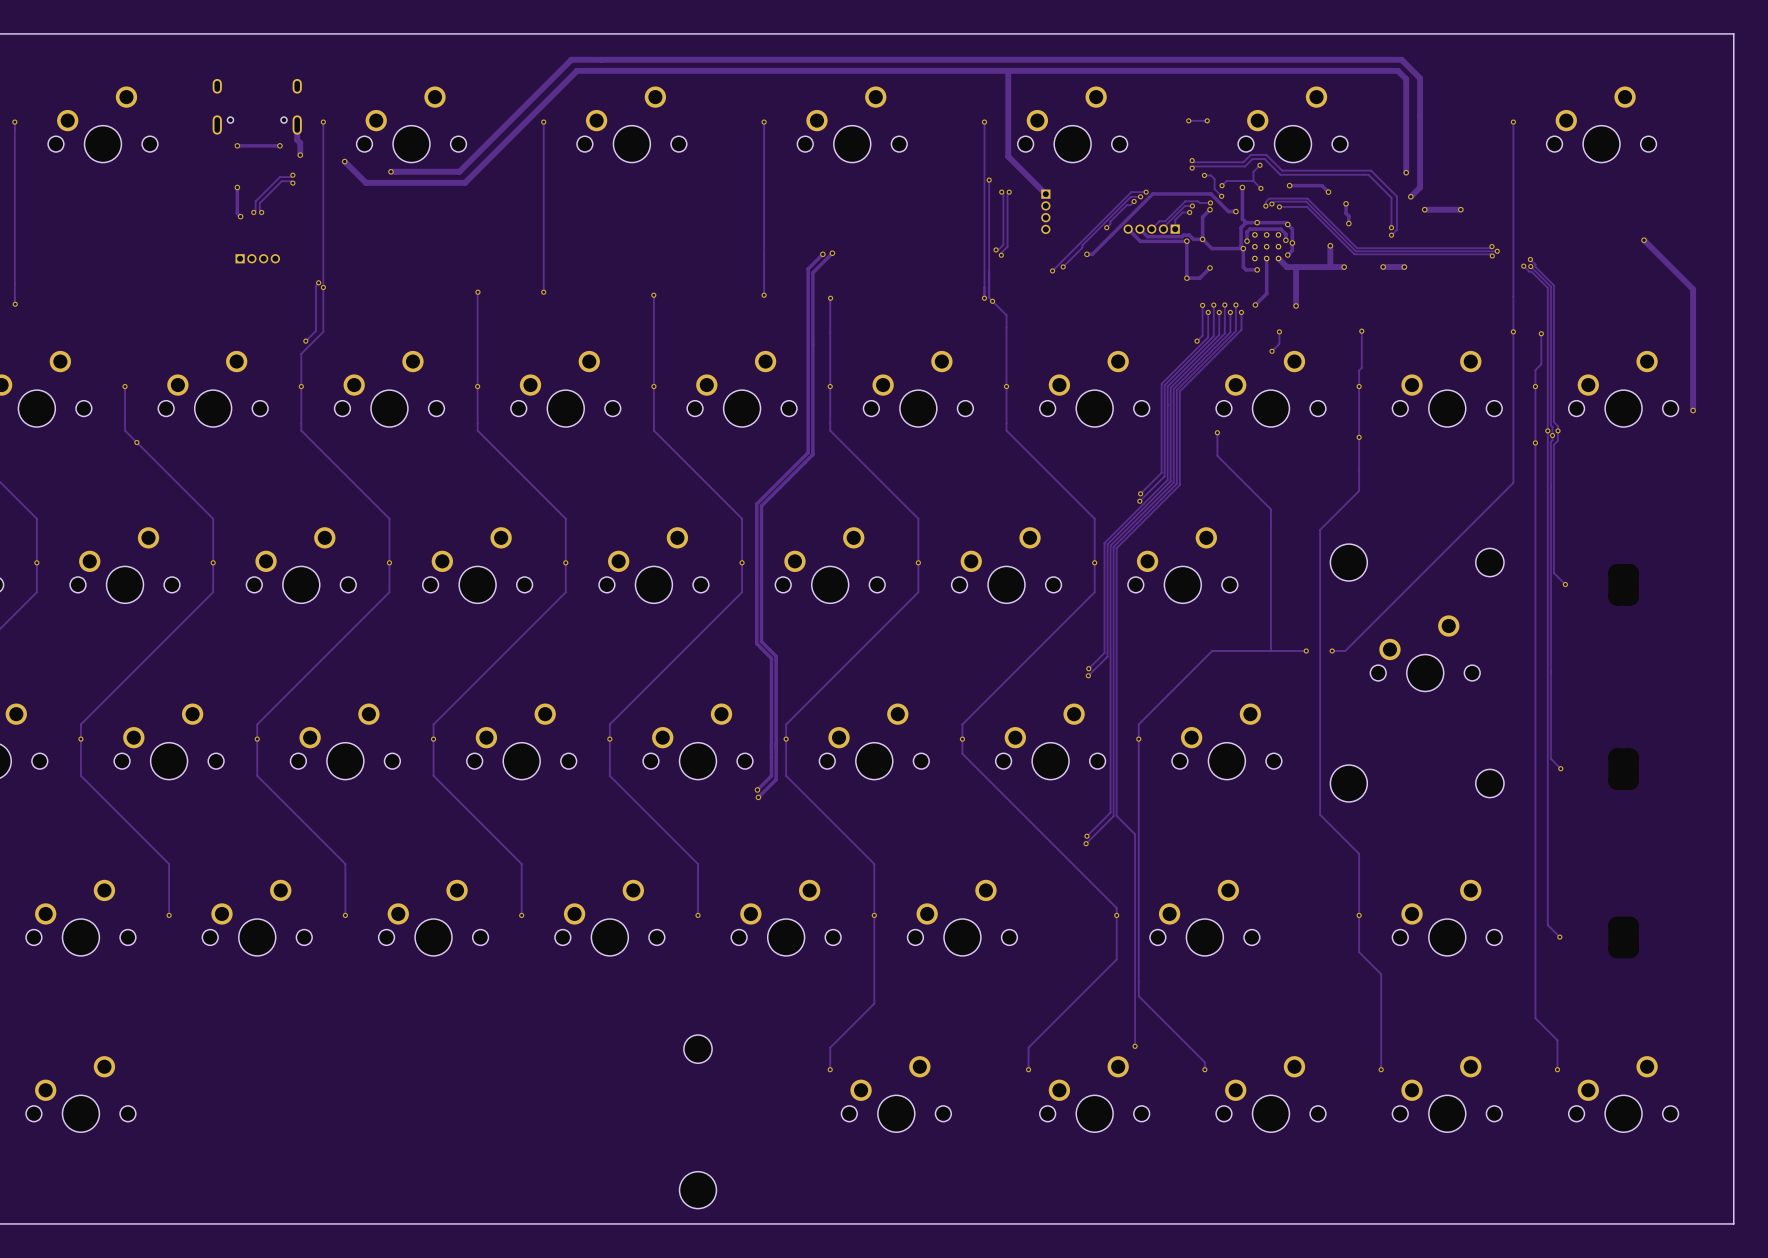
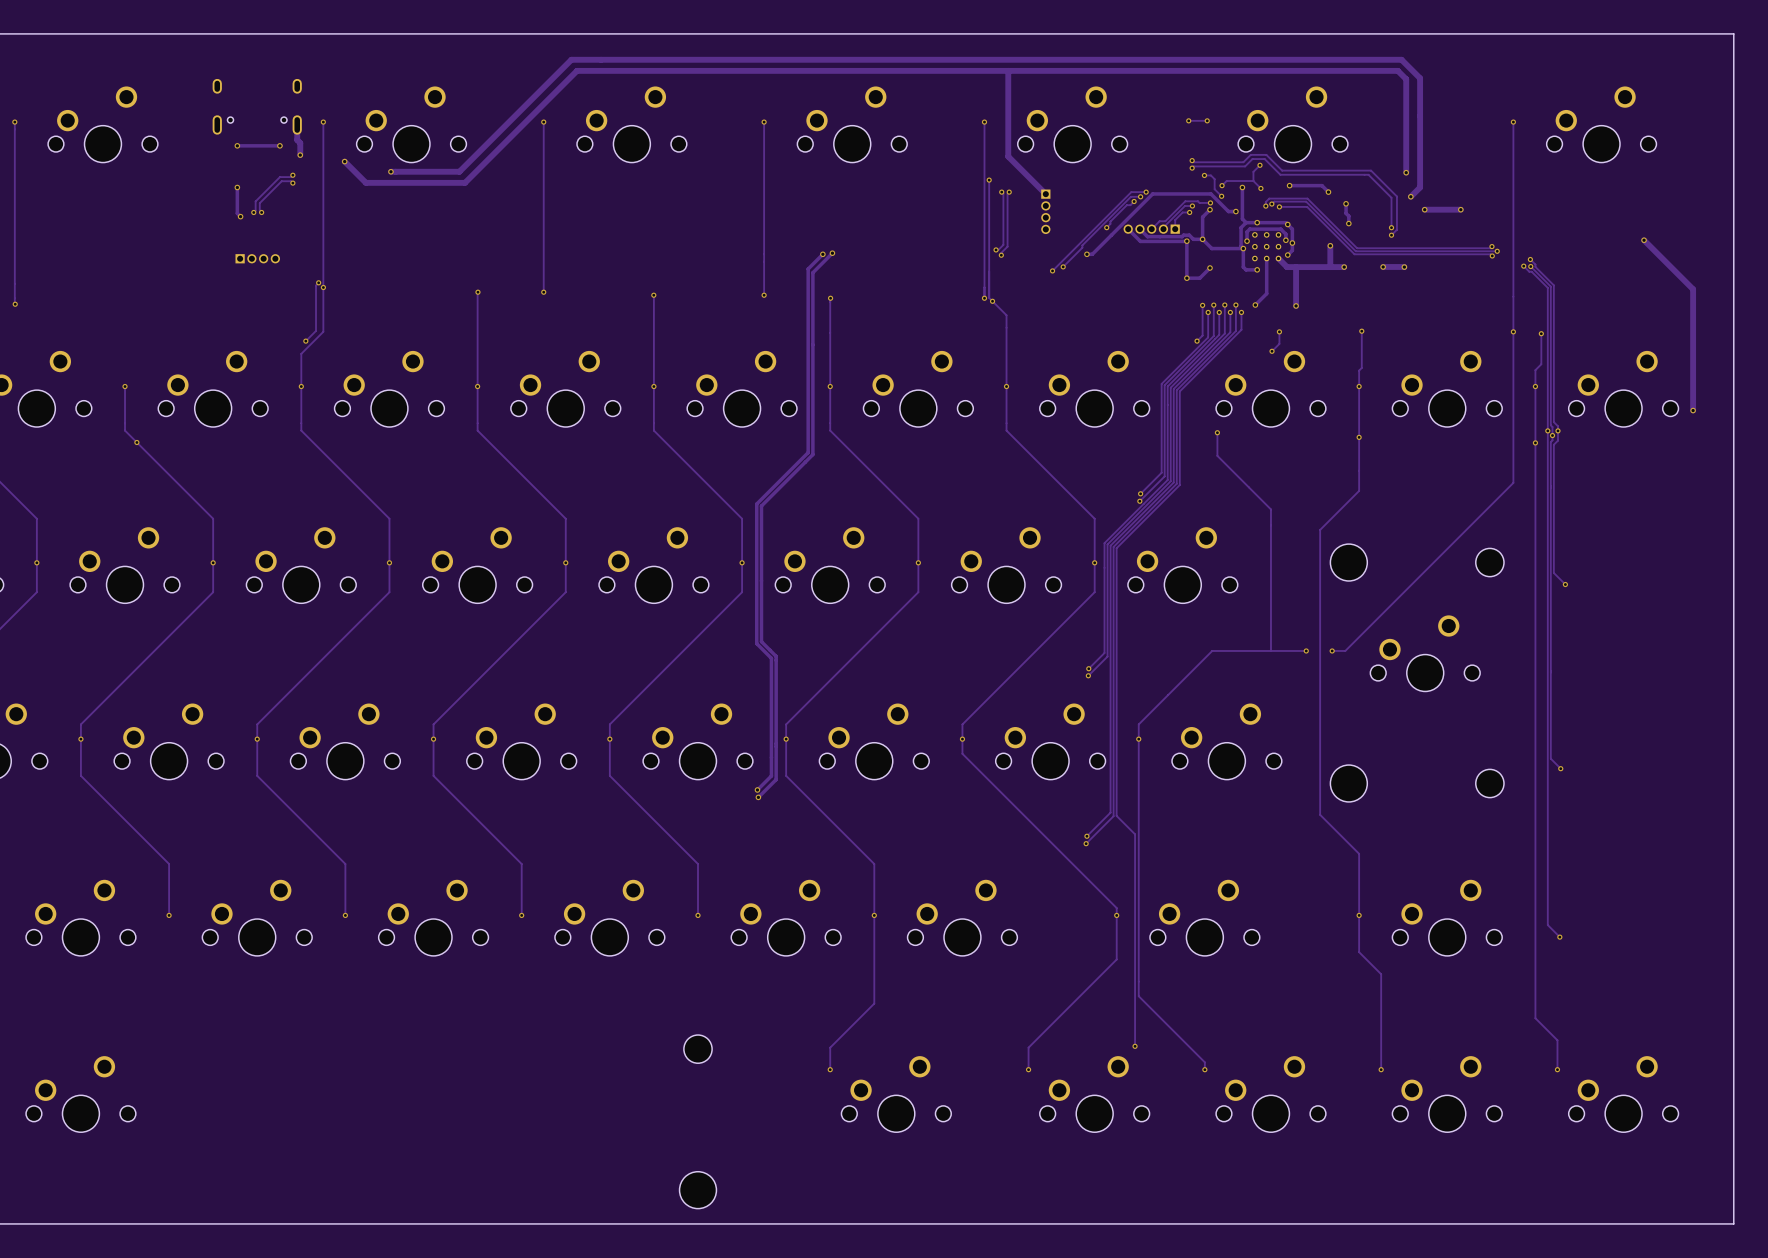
part: (1623, 584) -> none
part: (1623, 769) -> none
part: (1623, 937) -> none

